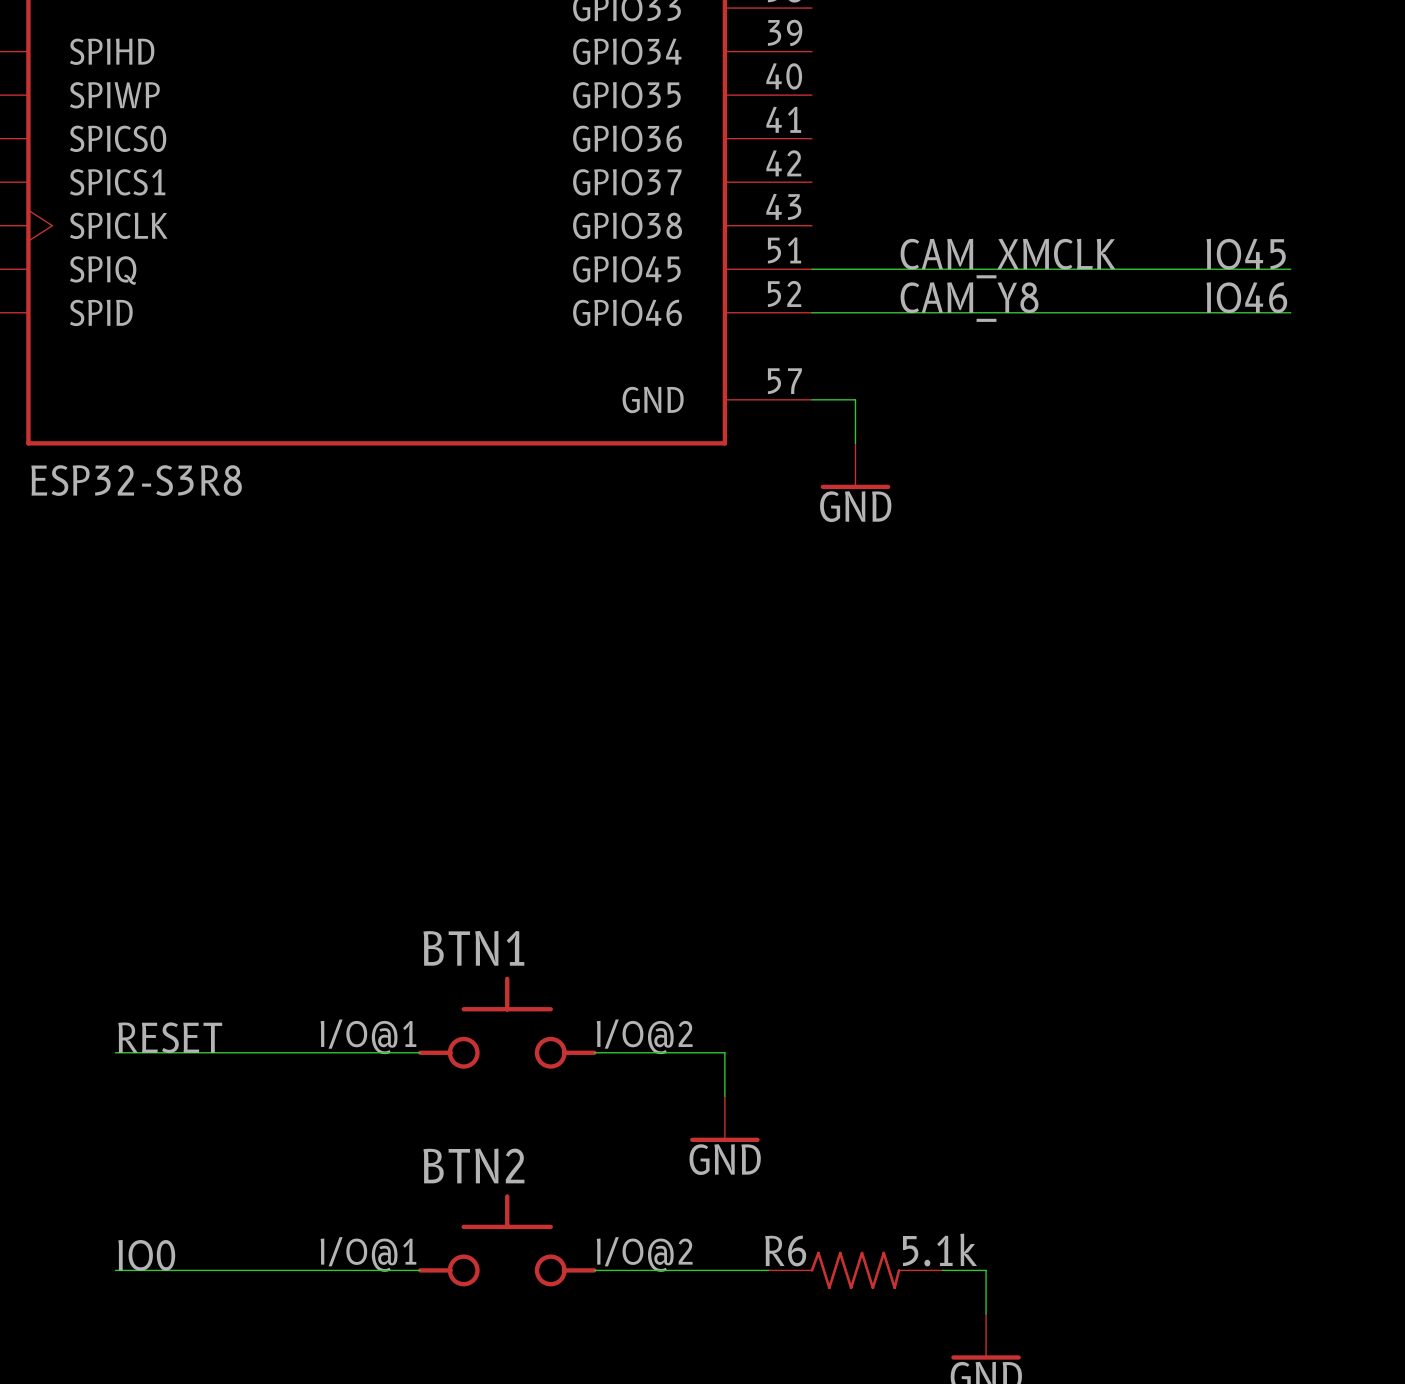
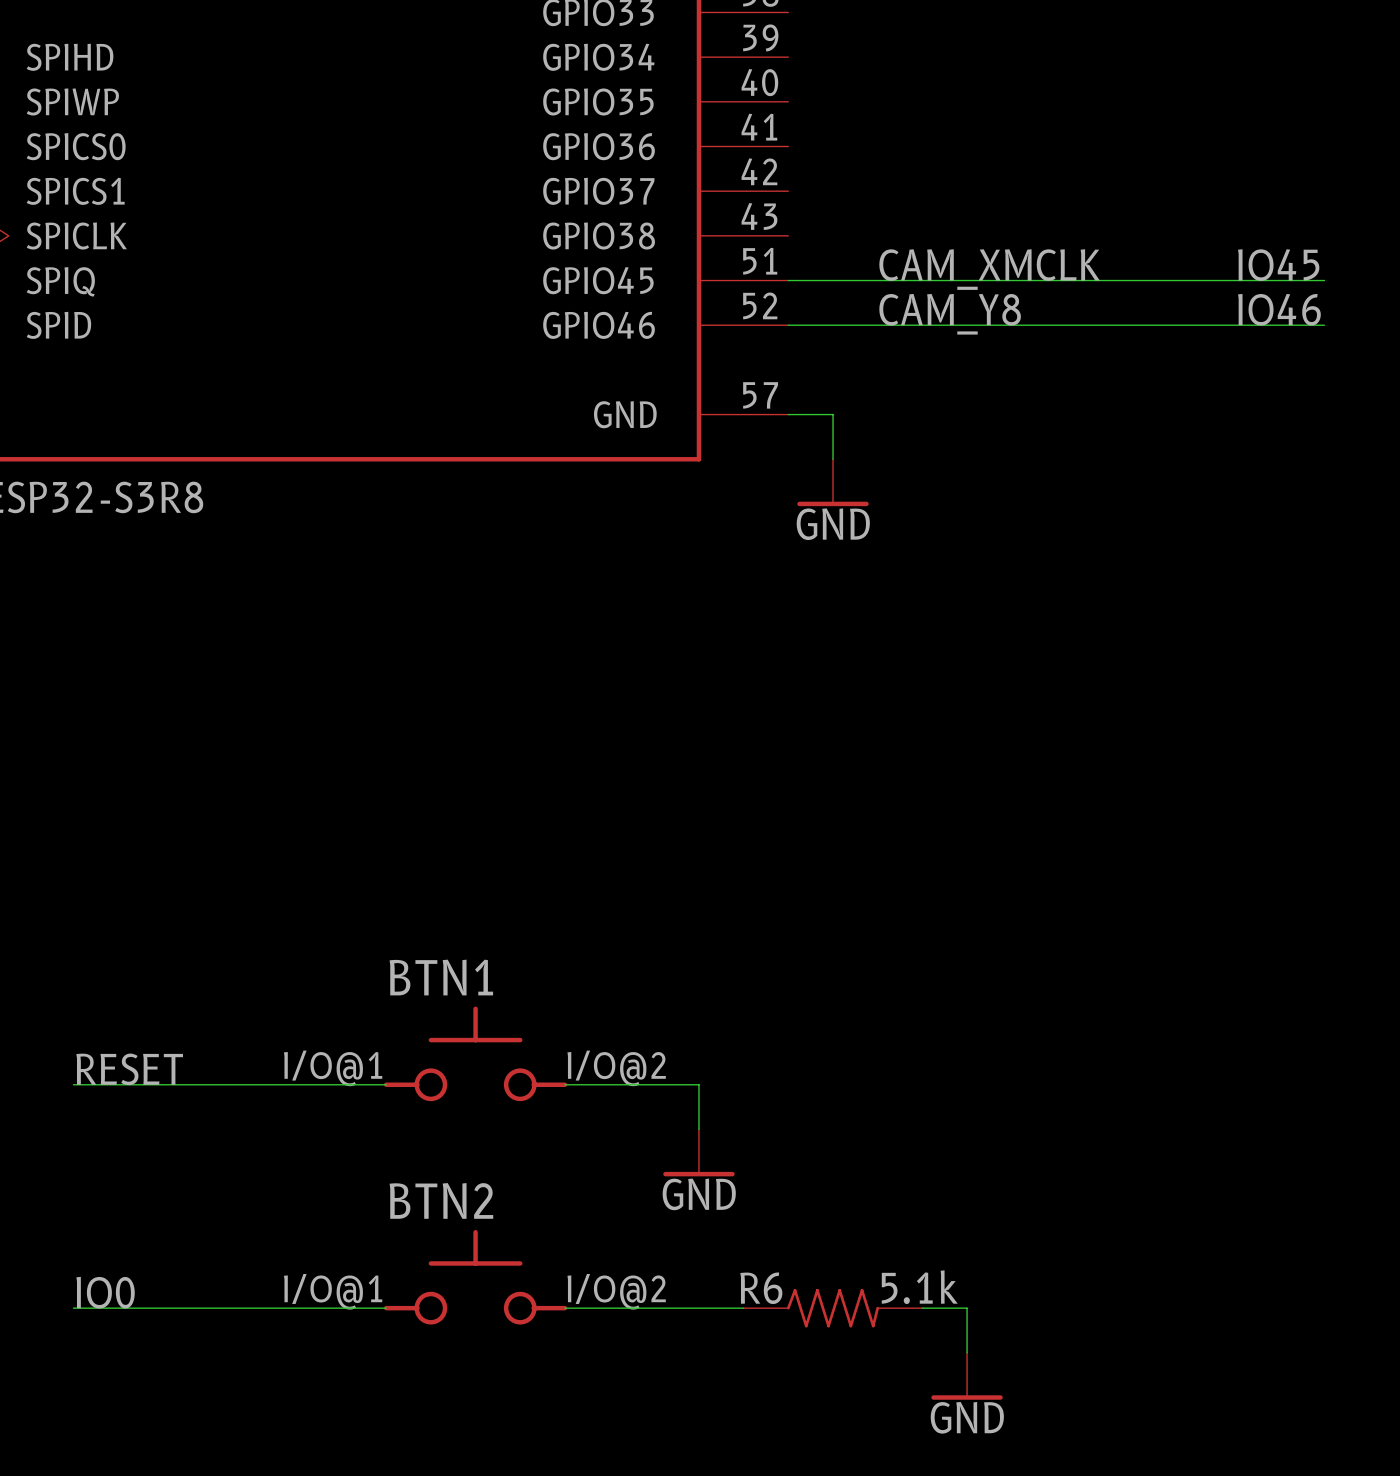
label position: IO45 (1246, 254) -> IO45 (1278, 265)
wire: none -> (1279, 280) (1324, 280)
label position: IO46 (1246, 297) -> IO46 (1279, 309)
wire: none -> (1279, 325) (1324, 325)

